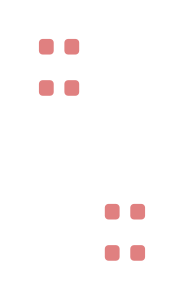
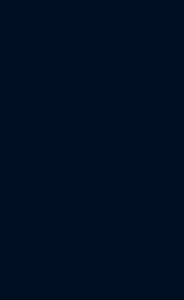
part: (59, 46) -> none
part: (59, 87) -> none
part: (124, 211) -> none
part: (124, 252) -> none

